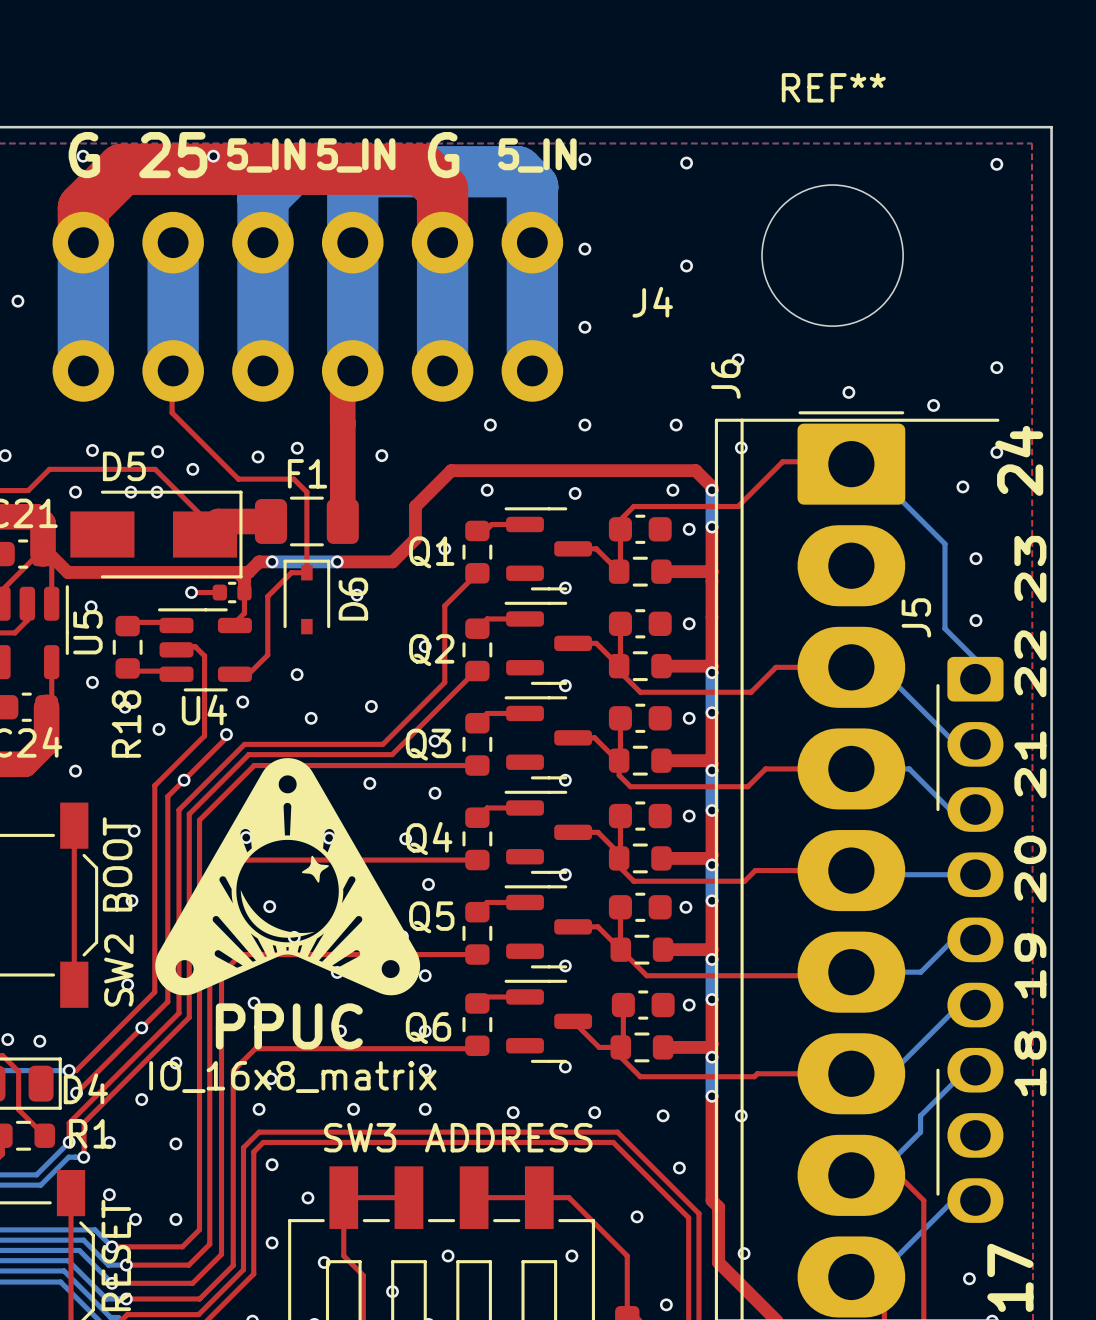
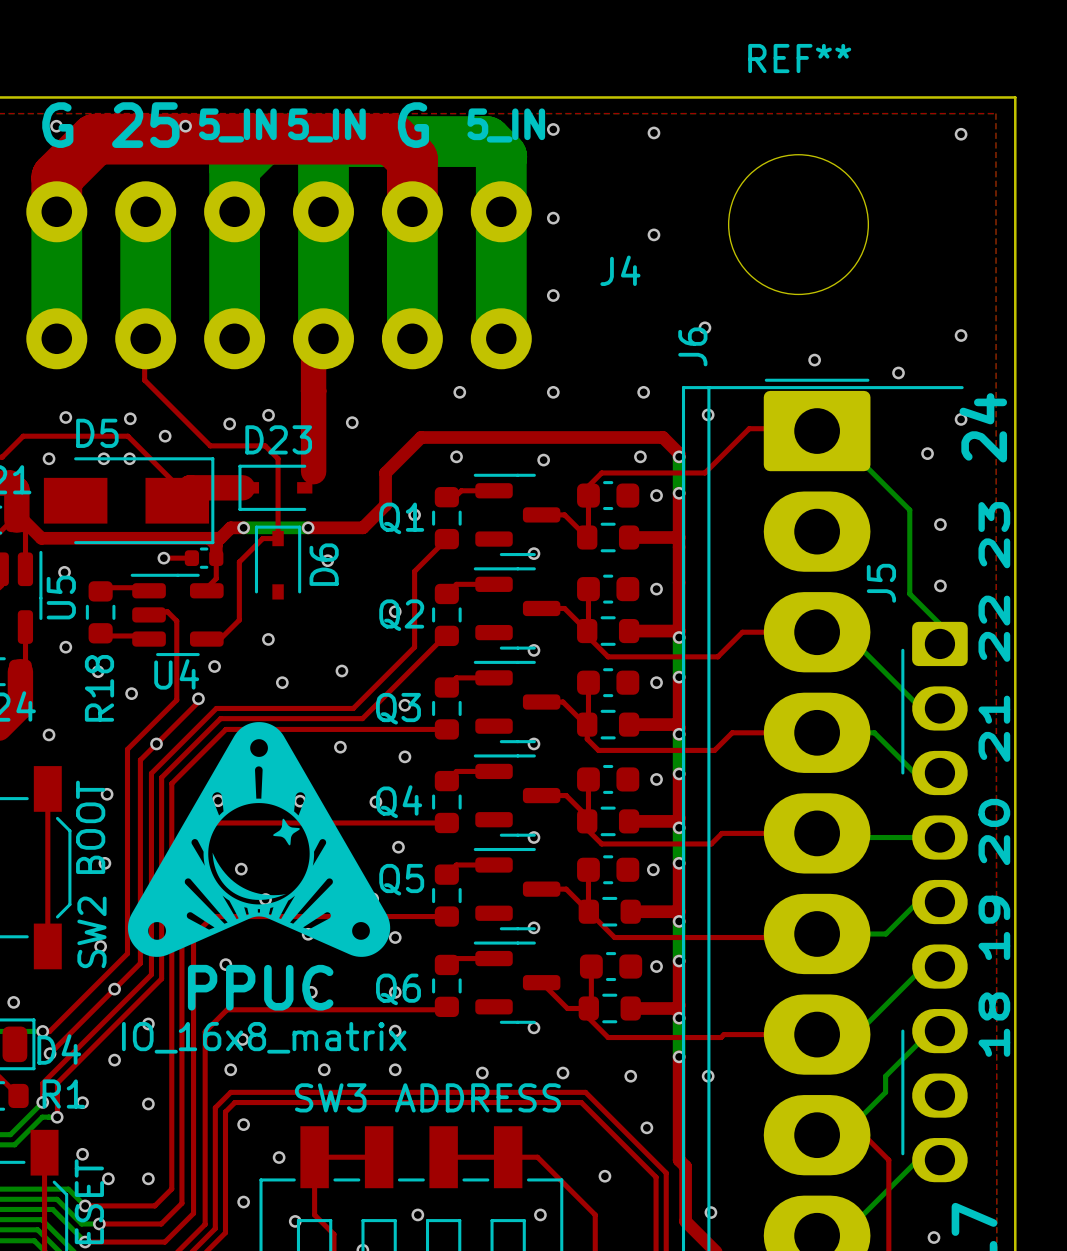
D23: none -> (275, 487)
F1: (306, 521) -> none

